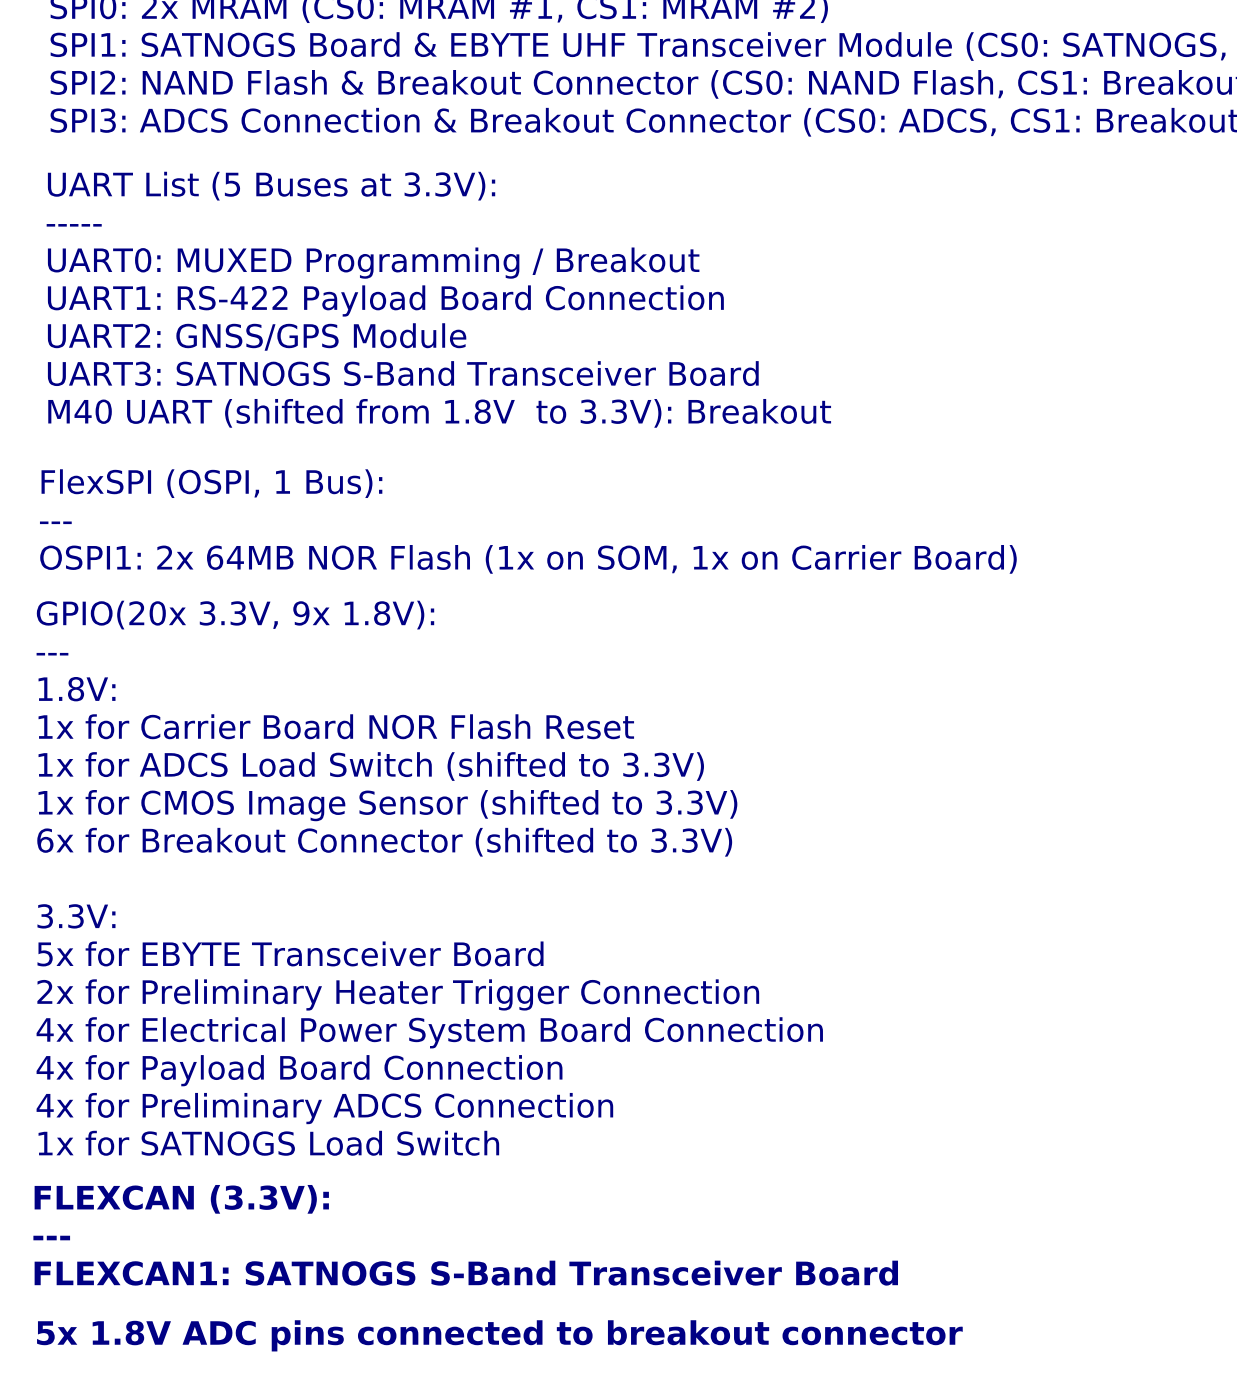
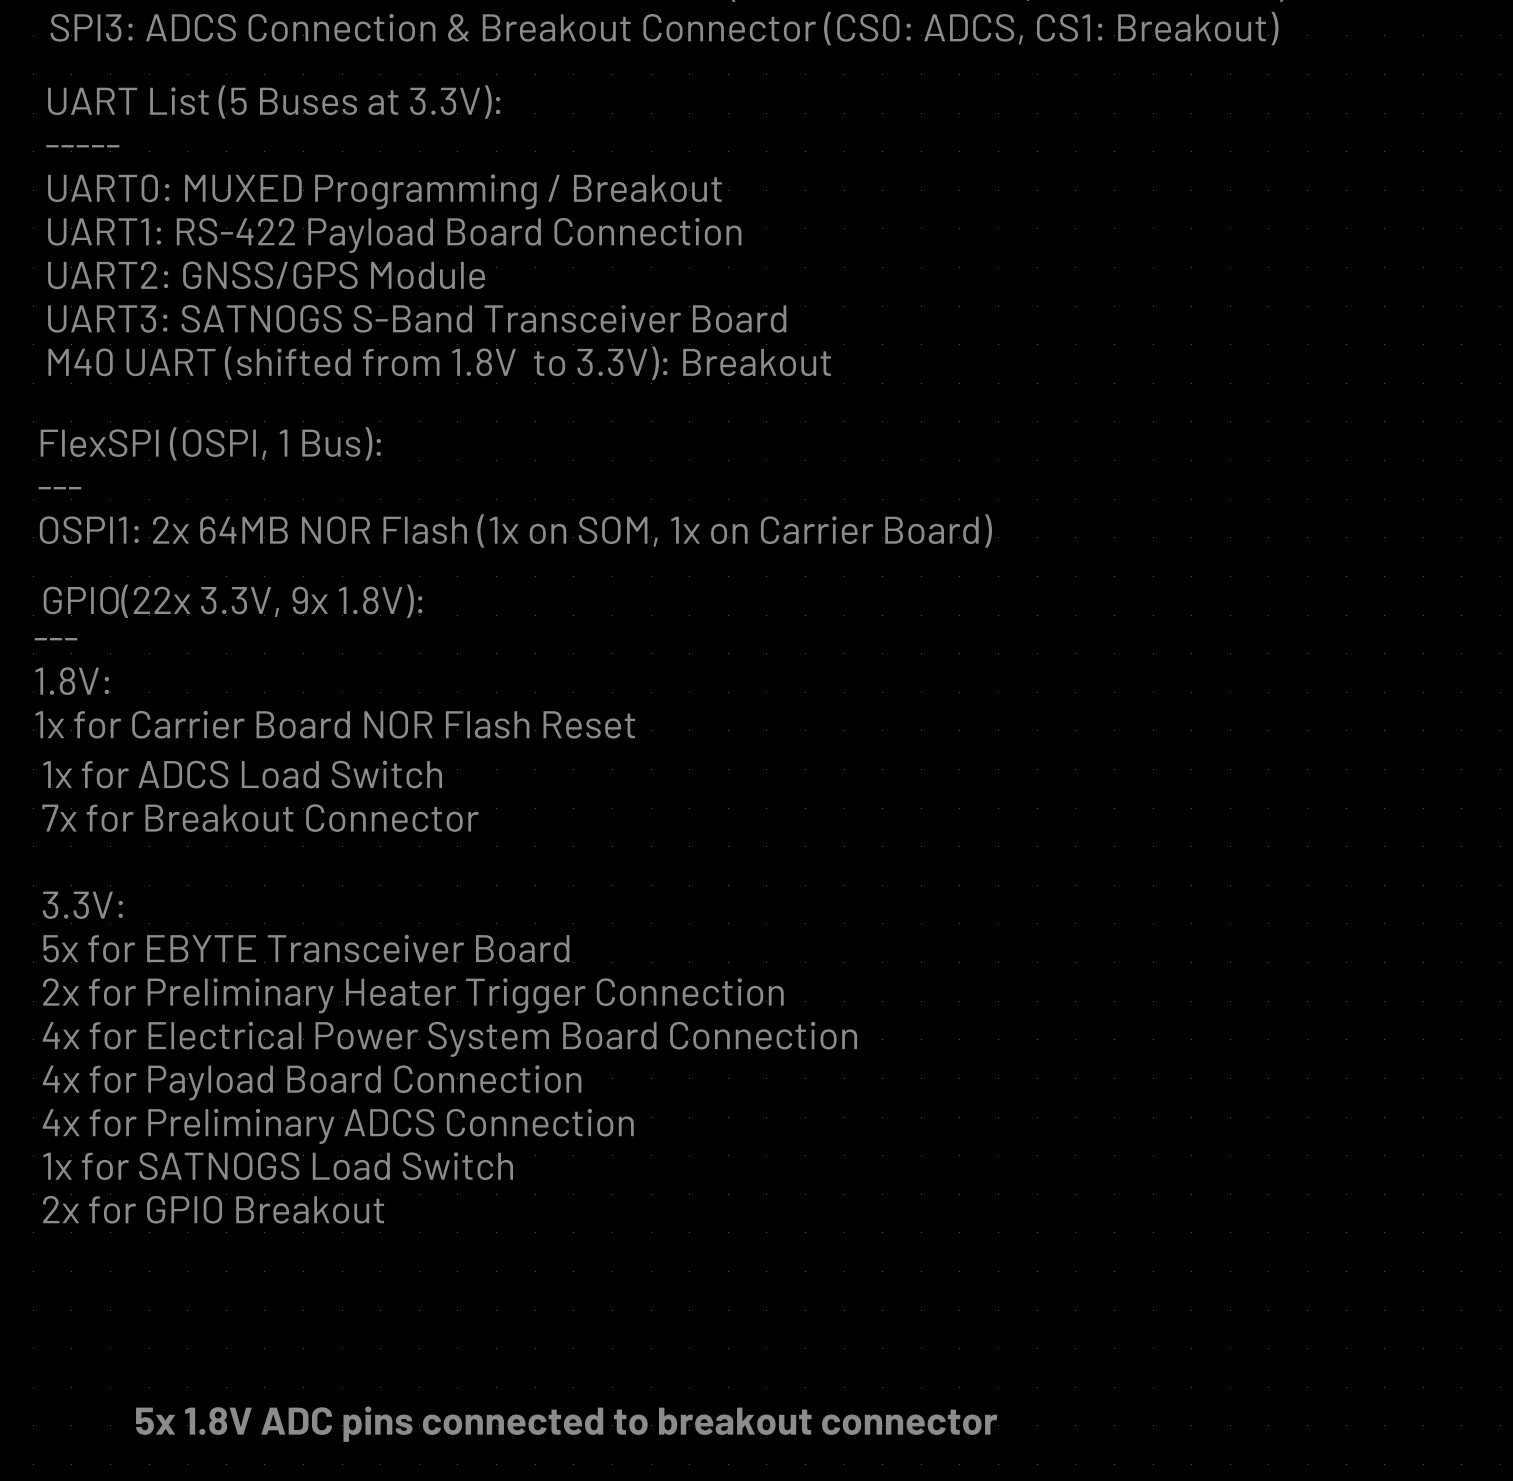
text: GPIO(20x 3.3V, 9x 1.8V): (235, 615) -> GPIO(22x 3.3V, 9x 1.8V): (233, 601)
text: 1x for ADCS Load Switch (shifted to 3.3V) (371, 766) -> 1x for ADCS Load Switch (242, 774)
text: 1x for CMOS Image Sensor (shifted to 3.3V) (387, 805) -> 7x for Breakout Connector (260, 818)
text: 6x for Breakout Connector (shifted to 3.3V) (384, 842) -> none
text position: 3.3V: (76, 916) -> 3.3V: (82, 905)
text position: 5x for EBYTE Transceiver Board (290, 953) -> 5x for EBYTE Transceiver Board (306, 948)
text position: 2x for Preliminary Heater Trigger Connection (398, 994) -> 2x for Preliminary Heater Trigger Connection (413, 995)
text position: 4x for Electrical Power System Board Connection (429, 1032) -> 4x for Electrical Power System Board Connection (449, 1039)
text position: 4x for Payload Board Connection (299, 1070) -> 4x for Payload Board Connection (312, 1082)
text position: 4x for Preliminary ADCS Connection (324, 1108) -> 4x for Preliminary ADCS Connection (338, 1126)
text position: 1x for SATNOGS Load Switch (268, 1143) -> 1x for SATNOGS Load Switch (278, 1166)
text: none -> 2x for GPIO Breakout (213, 1209)
text: FLEXCAN (3.3V): (181, 1199) -> none
text: --- (51, 1238) -> none
text: FLEXCAN1: SATNOGS S-Band Transceiver Board (466, 1273) -> none

